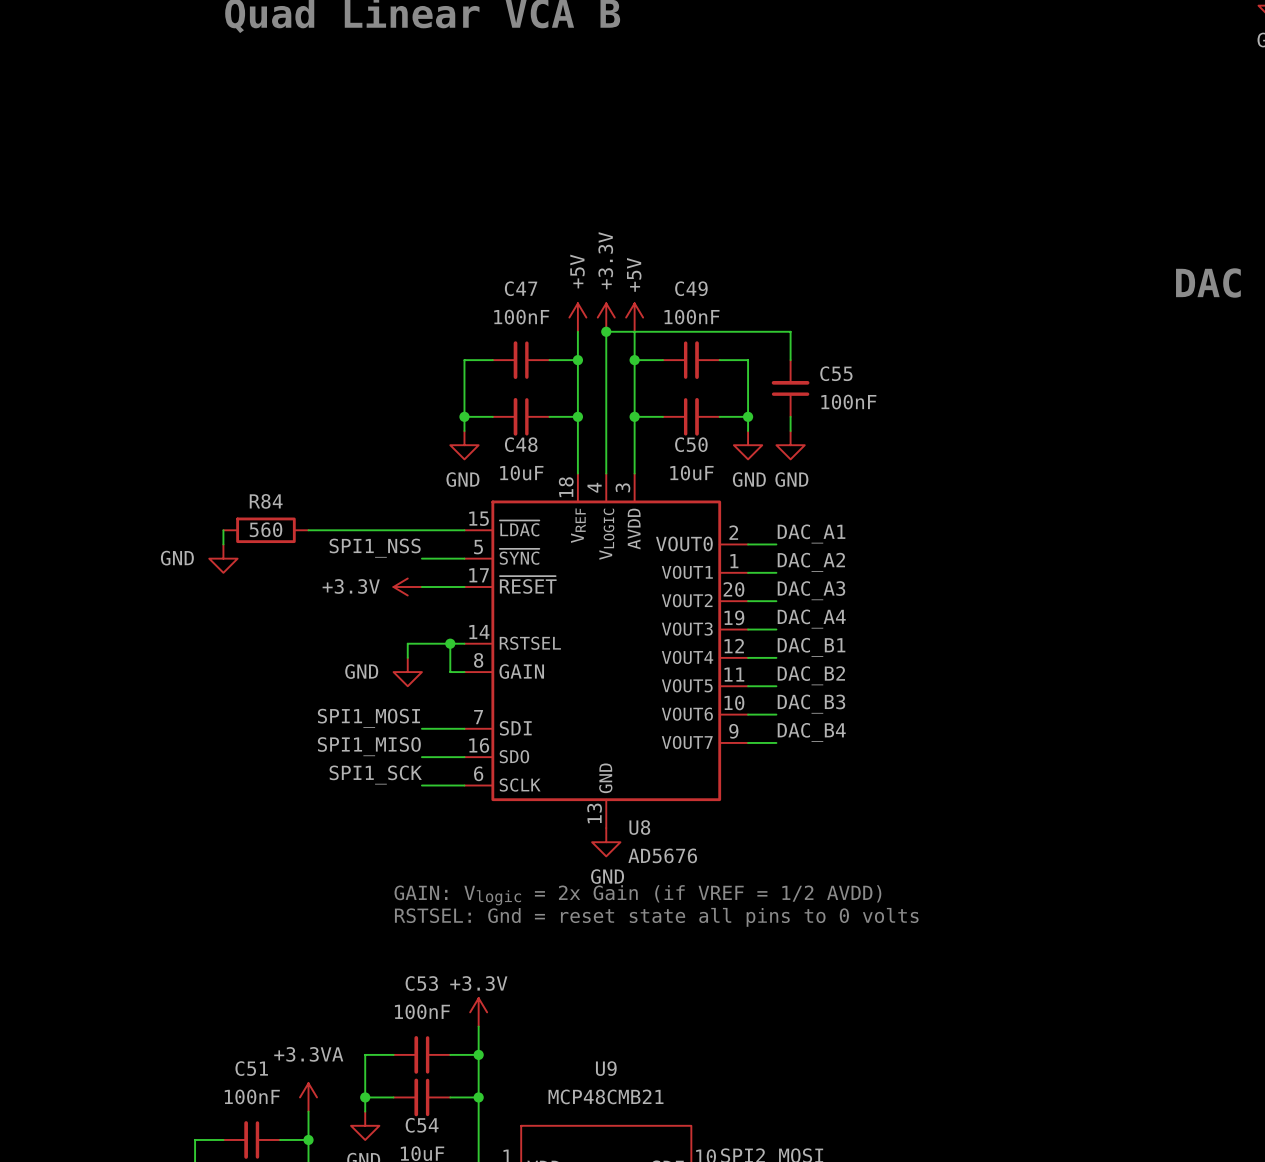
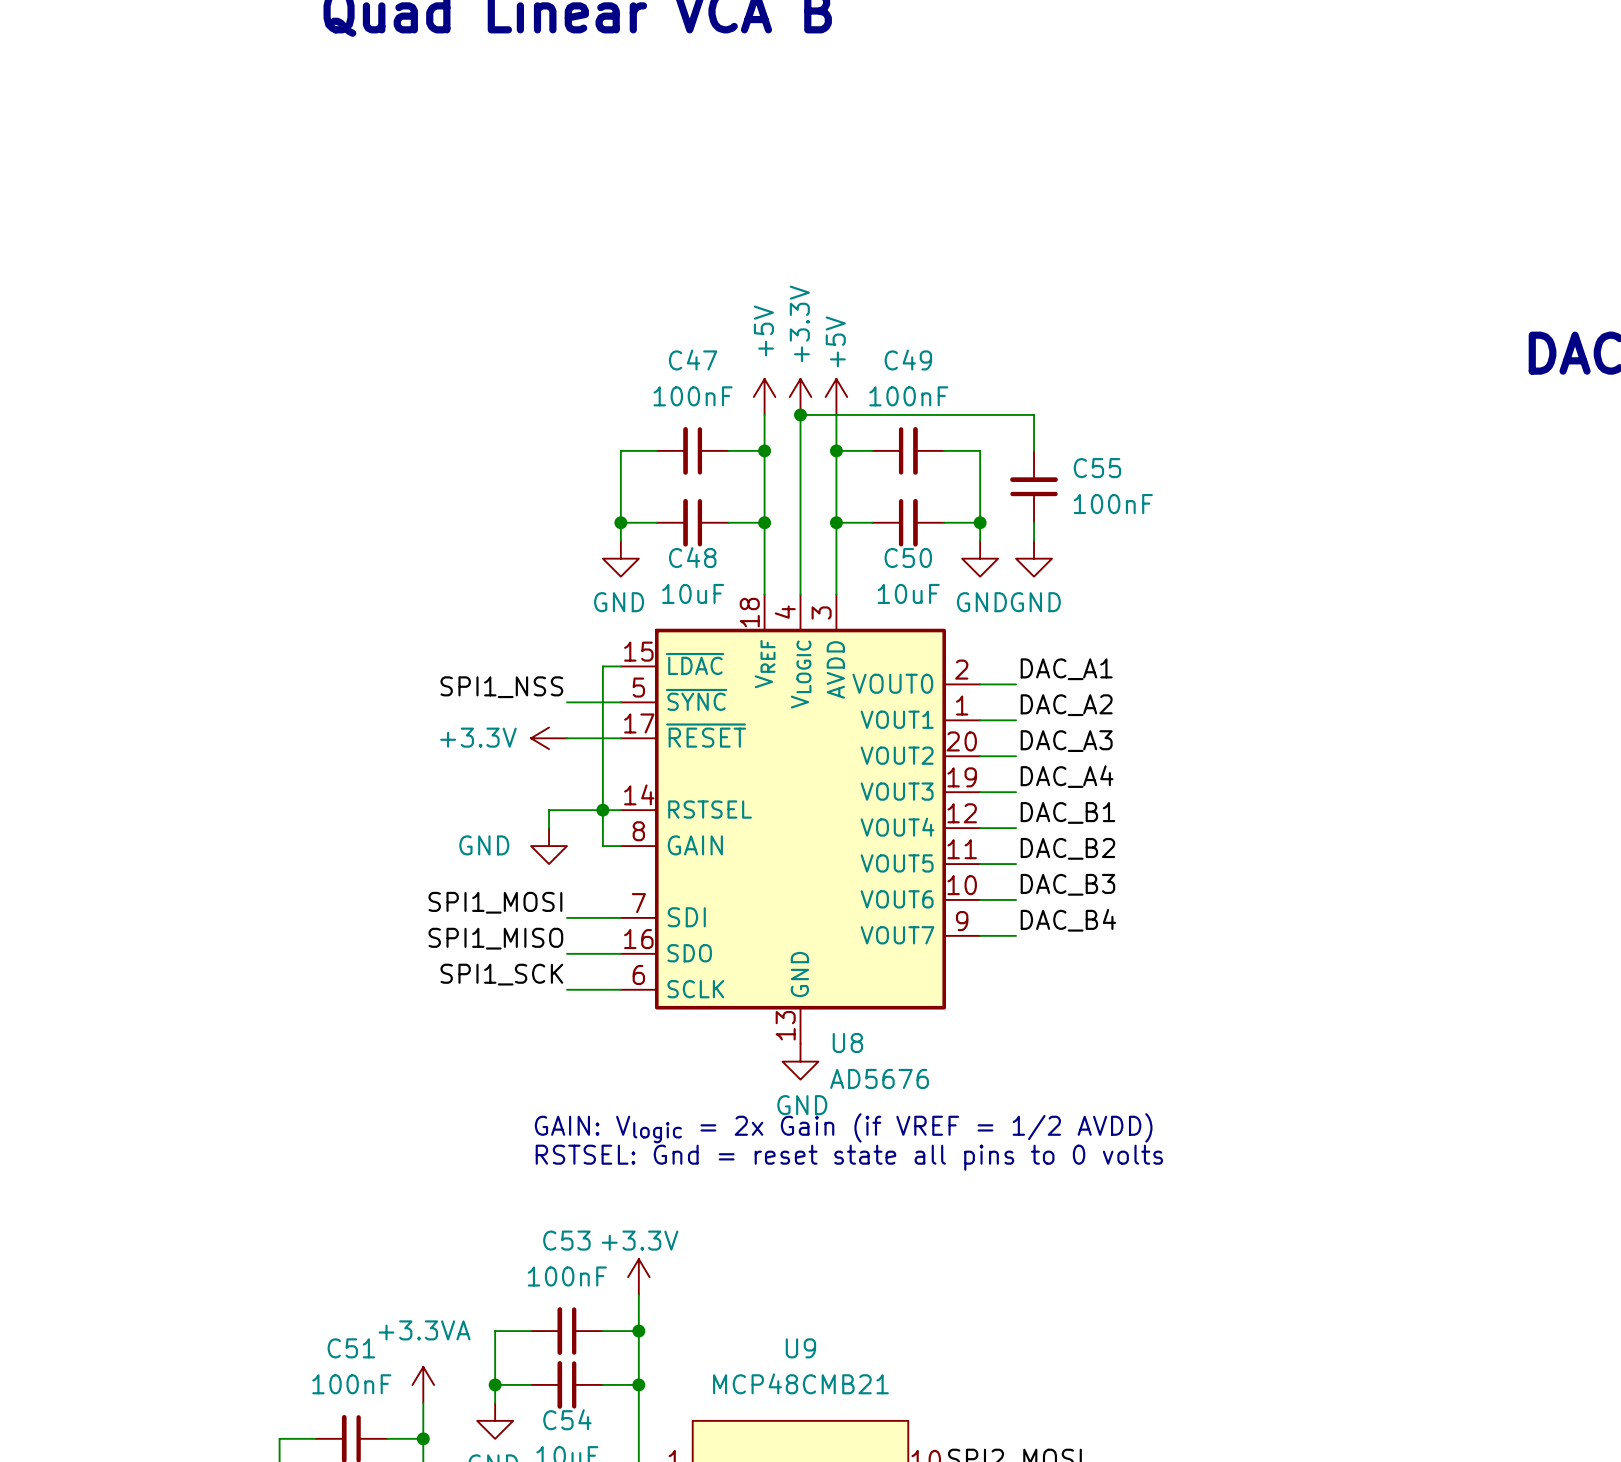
wire: (223, 530) (223, 544) -> none
R84: 560 (265, 530) -> none
wire: (308, 530) (450, 530) -> (602, 810) (602, 666)
power symbol: GND (223, 558) -> none

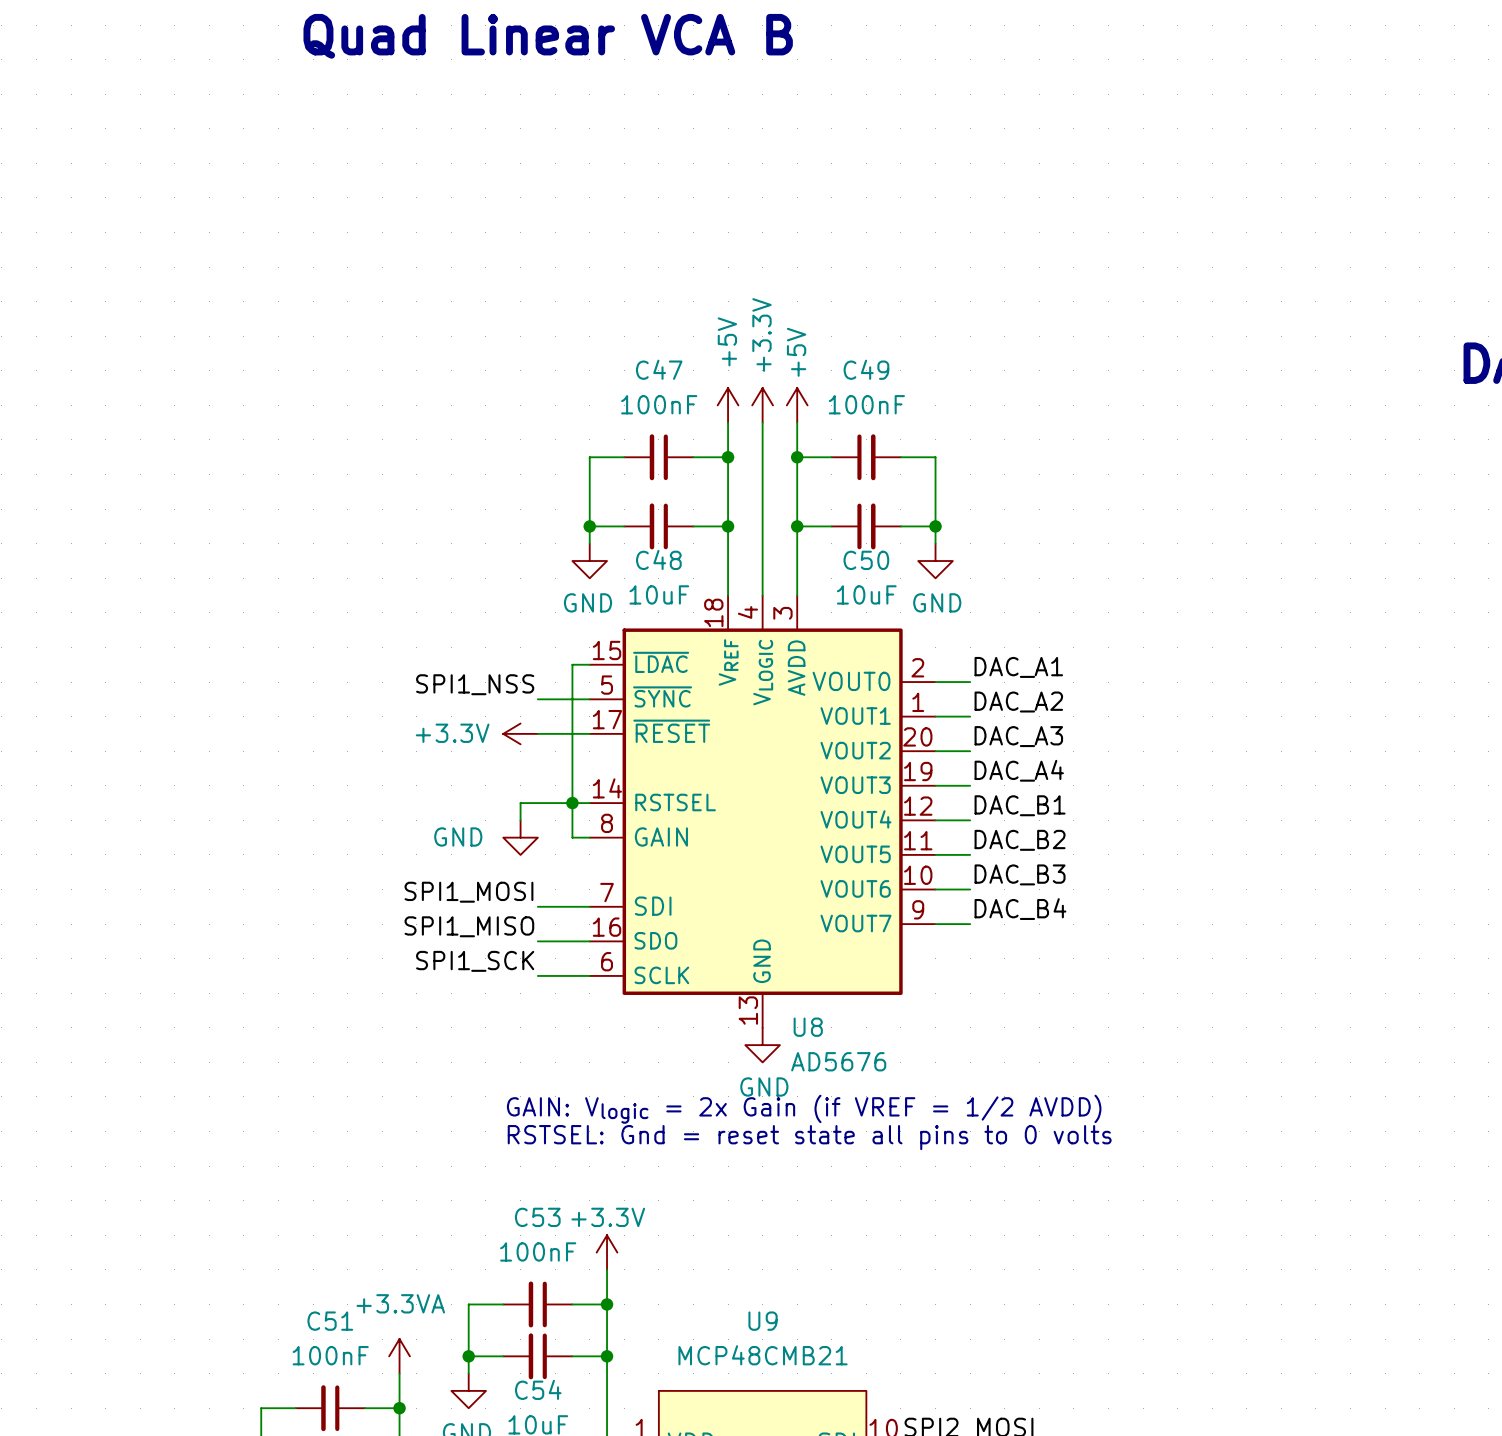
wire: (800, 414) (1034, 414) (1034, 450) -> none
junction: (800, 414) -> none
C55: 100nF (1034, 486) -> none
wire: (1034, 522) (1034, 540) -> none
power symbol: GND (1034, 558) -> none

